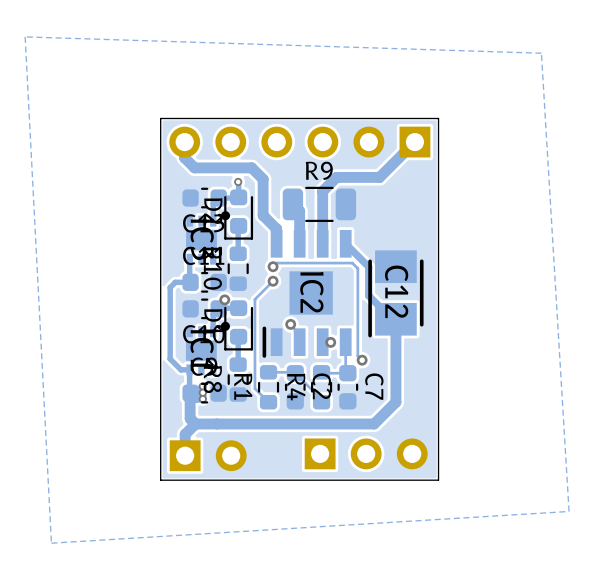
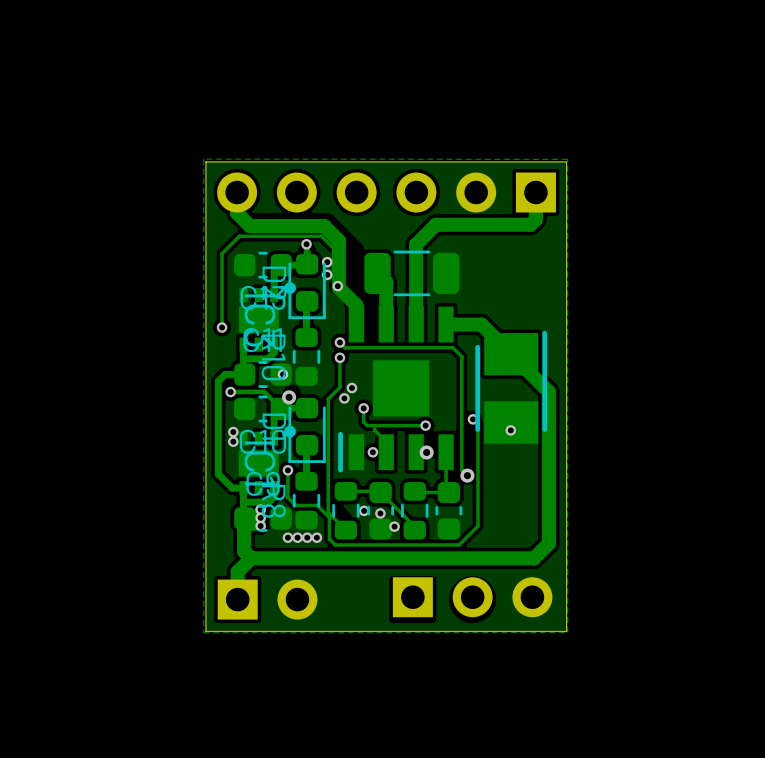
zone outline: (25, 36) (541, 53) (569, 511) (51, 543) (25, 36) -> none
zone outline: none -> (203, 159) (567, 159) (567, 632) (203, 632) (203, 159)
track: (414, 142) (379, 177) (336, 177) (322, 191) -> (535, 192) (535, 219) (530, 224) (435, 224) (416, 244) (416, 256)
R9 name: R9 (319, 170) -> none
via: none -> (327, 262)
via: none -> (327, 274)
track: none -> (337, 286) (337, 252) (321, 236) (239, 236) (222, 253) (222, 327)
via: none -> (337, 286)
track: (345, 243) (368, 266) (368, 295) (392, 319) (395, 319) (395, 402) (374, 423) -> (446, 324) (481, 324) (548, 391) (548, 543) (534, 558) (483, 558)
via: none -> (222, 327)
via: none -> (339, 342)
track: none -> (274, 344) (274, 352) (267, 358) (243, 358)
track: (352, 263) (276, 263) (273, 266) -> (454, 349) (453, 347) (345, 347) (339, 342)
via: (273, 266) -> none
via: none -> (339, 357)
track: (273, 281) (254, 301) -> (339, 357) (339, 387) (328, 398)
via: (273, 281) -> none
via: none -> (283, 374)
via: none -> (351, 388)
IC2 name: IC2 (311, 292) -> none
part: none -> (511, 387)
C12: (395, 293) -> none
track: none -> (230, 391) (264, 391) (281, 408)
via: none -> (230, 392)
via: none -> (344, 398)
track: none -> (363, 408) (363, 422) (367, 425) (425, 425)
via: none -> (363, 408)
track: none -> (473, 419) (478, 424) (478, 526) (459, 544) (335, 544) (329, 539) (329, 517) (317, 505) (295, 505) (287, 497) (287, 470)
via: none -> (473, 419)
via: none -> (425, 425)
via: (290, 324) -> none
via: none -> (510, 430)
via: none -> (233, 432)
via: none -> (233, 441)
via: none -> (372, 452)
via: none -> (287, 470)
track: none -> (274, 488) (274, 496) (268, 502) (243, 502)
R1 name: R1 (243, 386) -> none
C2 name: C2 (321, 386) -> none
C7 name: C7 (374, 386) -> none
via: none -> (364, 510)
R4 name: R4 (296, 387) -> none
via: none -> (380, 513)
via: none -> (394, 526)
via: none -> (287, 537)
via: none -> (297, 537)
via: none -> (307, 537)
via: none -> (316, 537)

